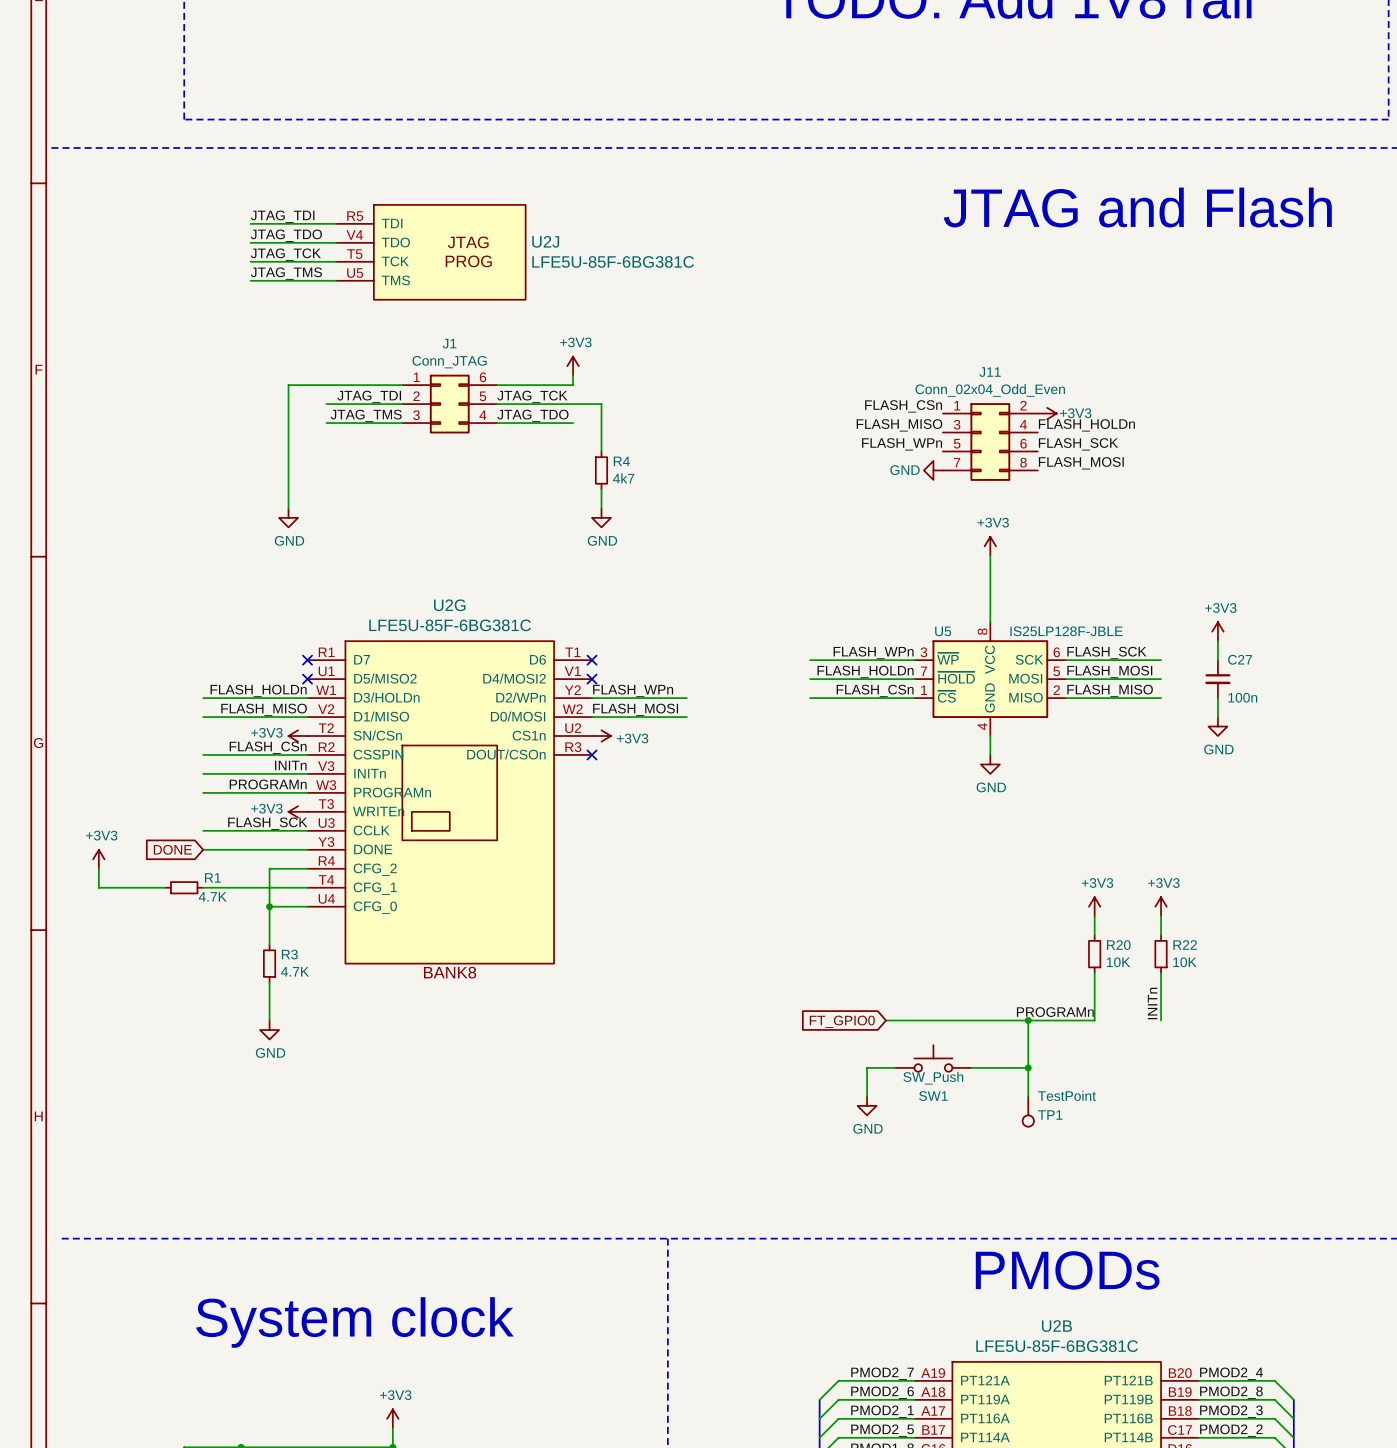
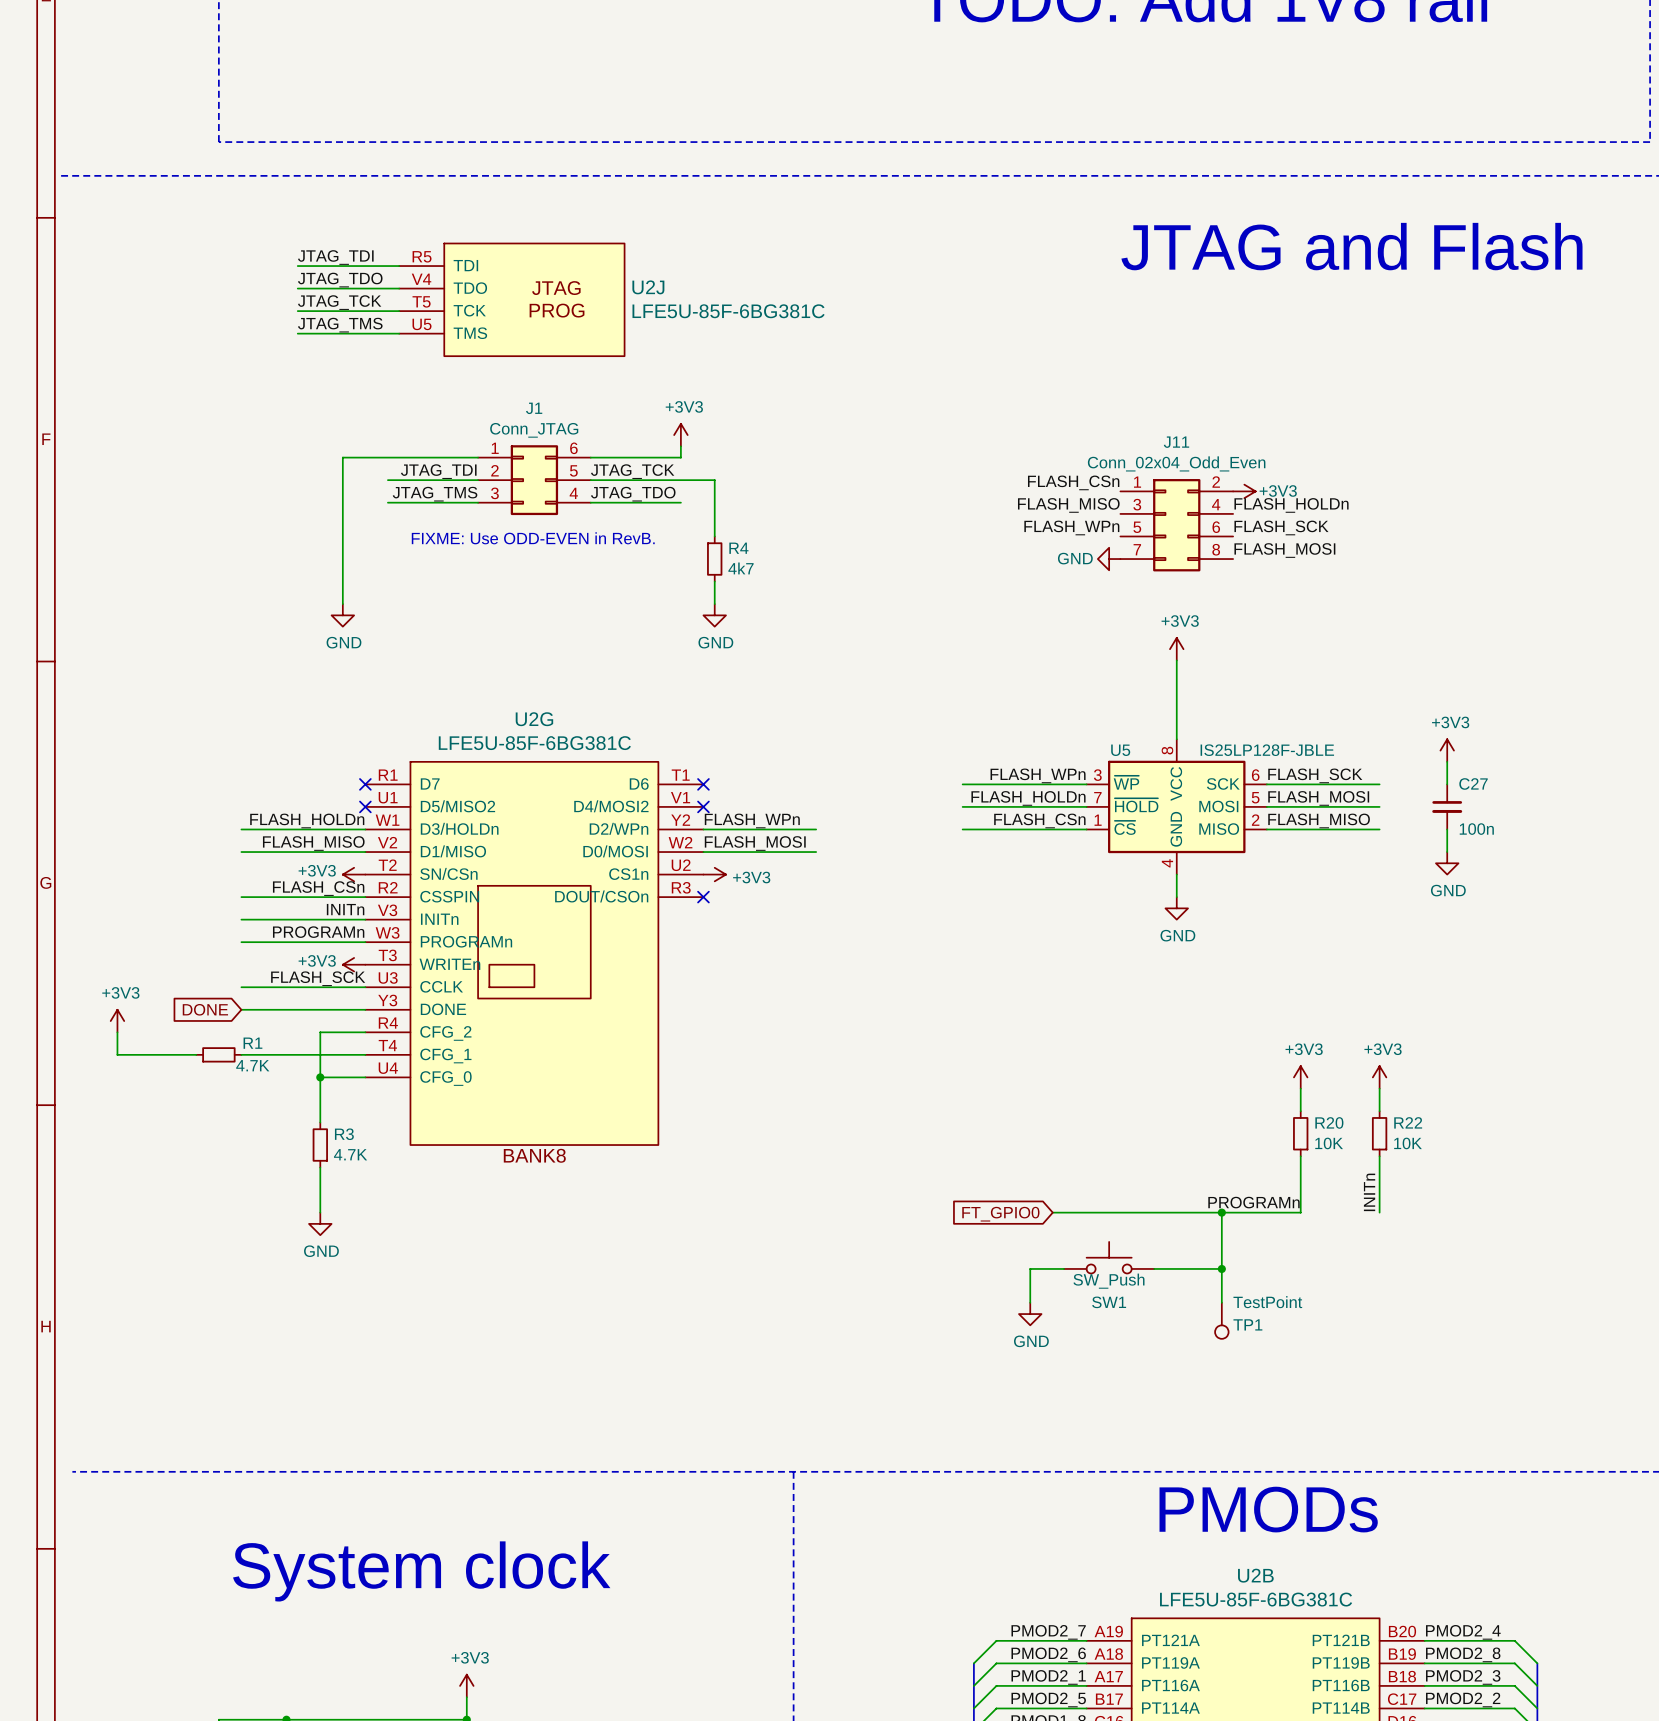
text: none -> FIXME: Use ODD-EVEN in RevB. (533, 538)

